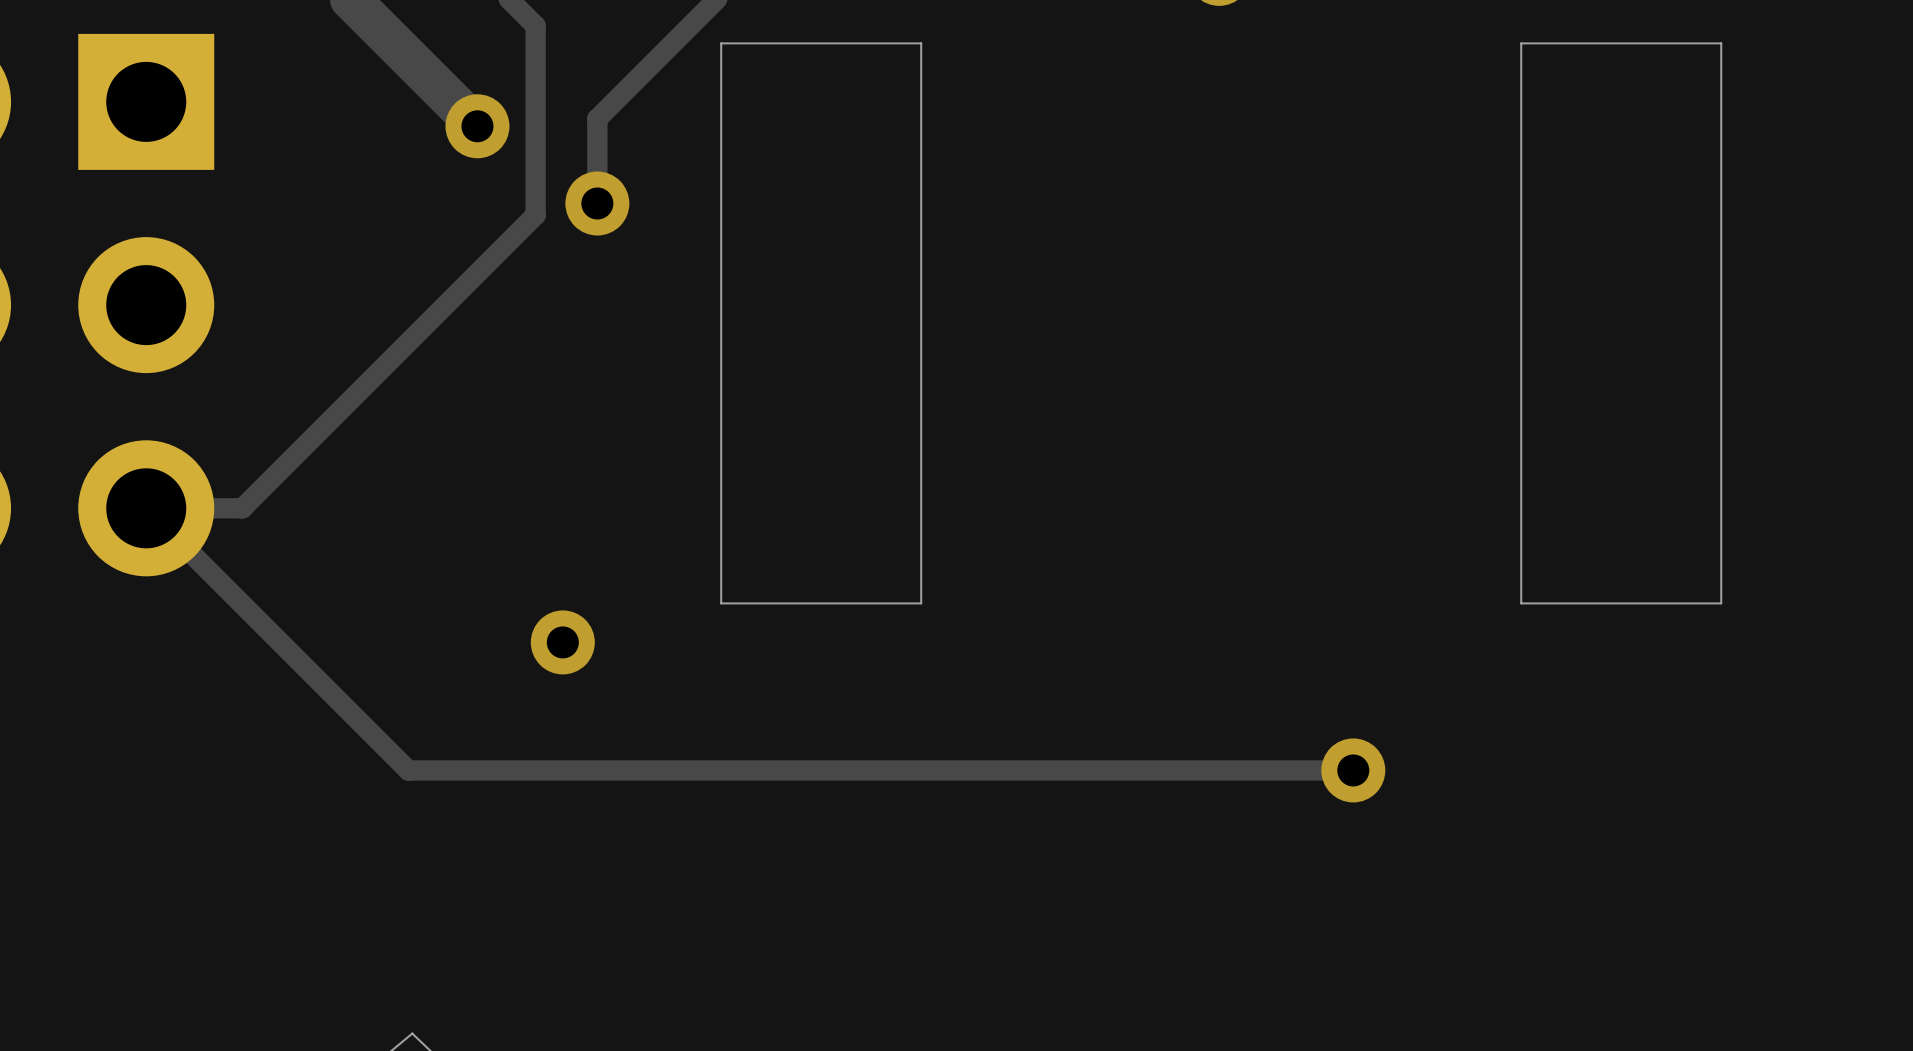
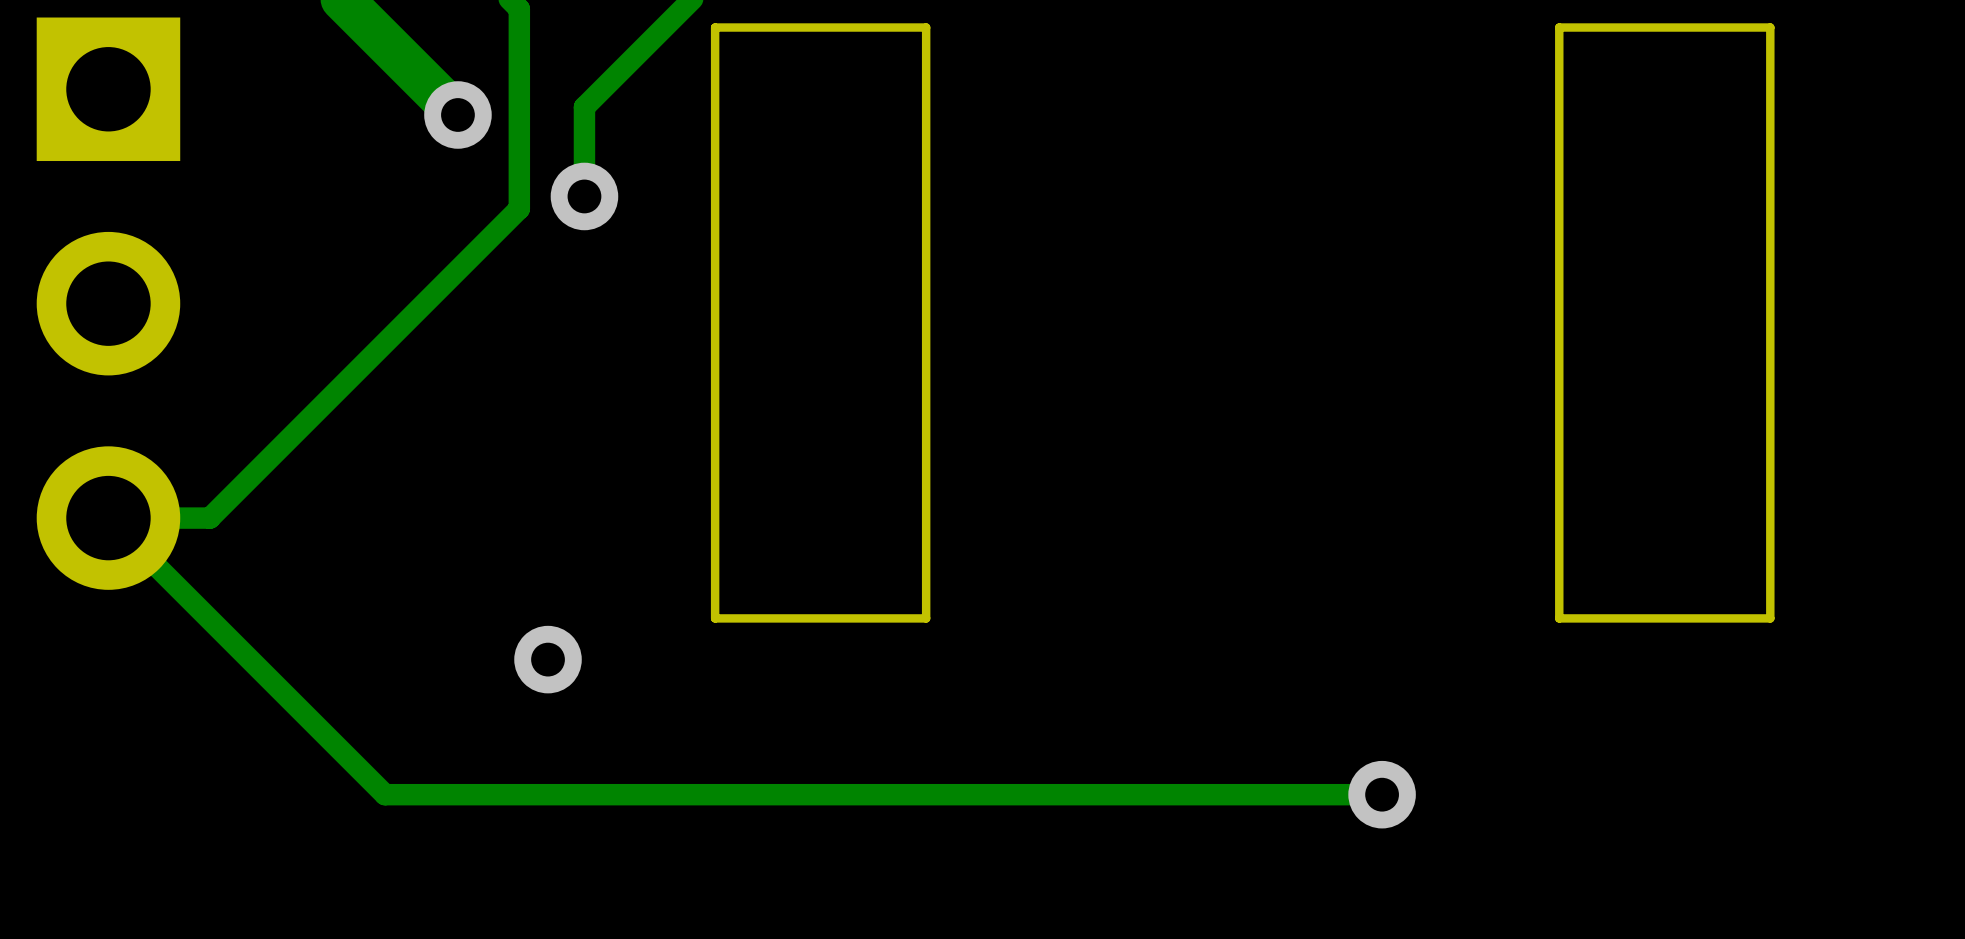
board edge width: thin (921, 43) (721, 43) (721, 603) (921, 603) (921, 43) -> thick (926, 27) (715, 27) (715, 618) (926, 618) (926, 27)
board edge width: thin (1721, 43) (1521, 43) (1521, 603) (1721, 603) (1721, 43) -> thick (1770, 27) (1559, 27) (1559, 618) (1770, 618) (1770, 27)

